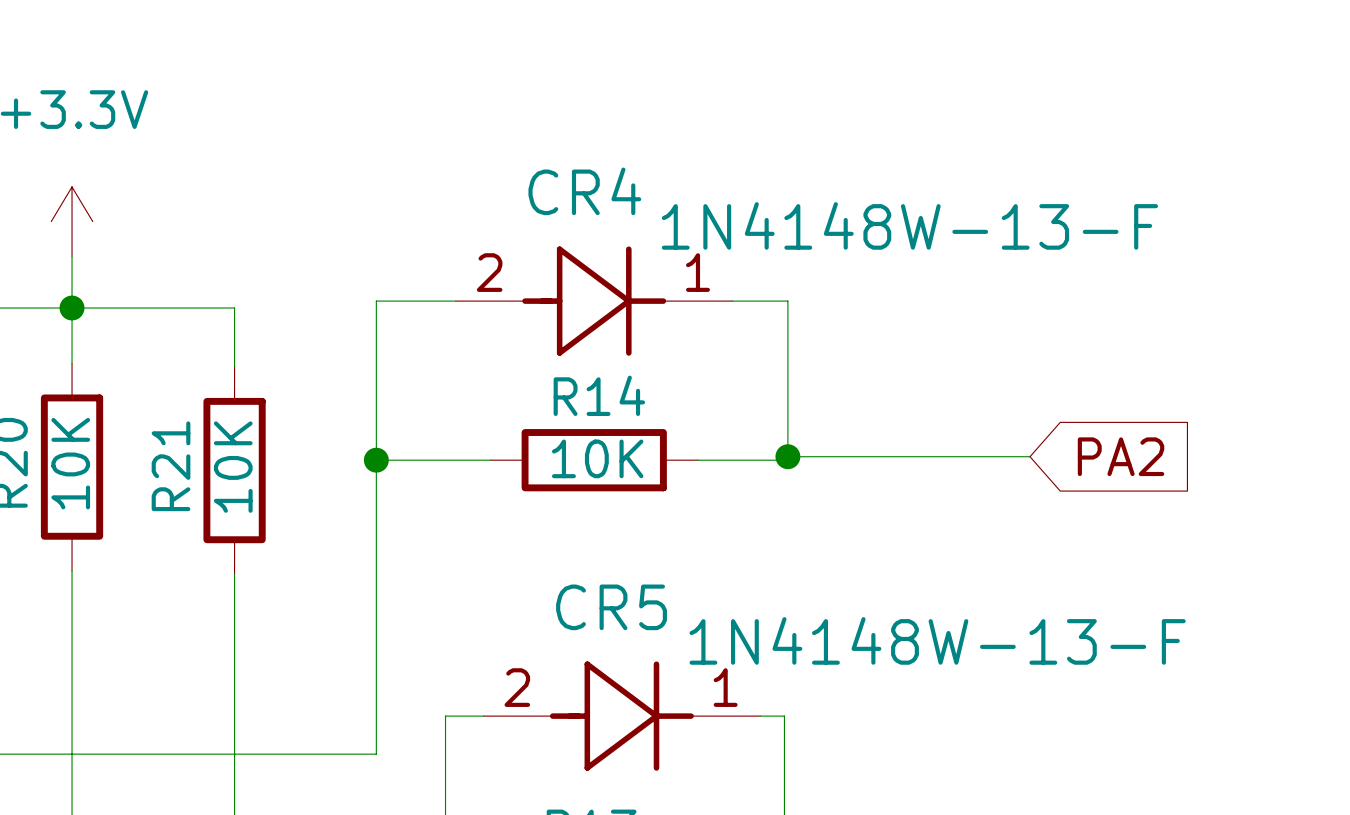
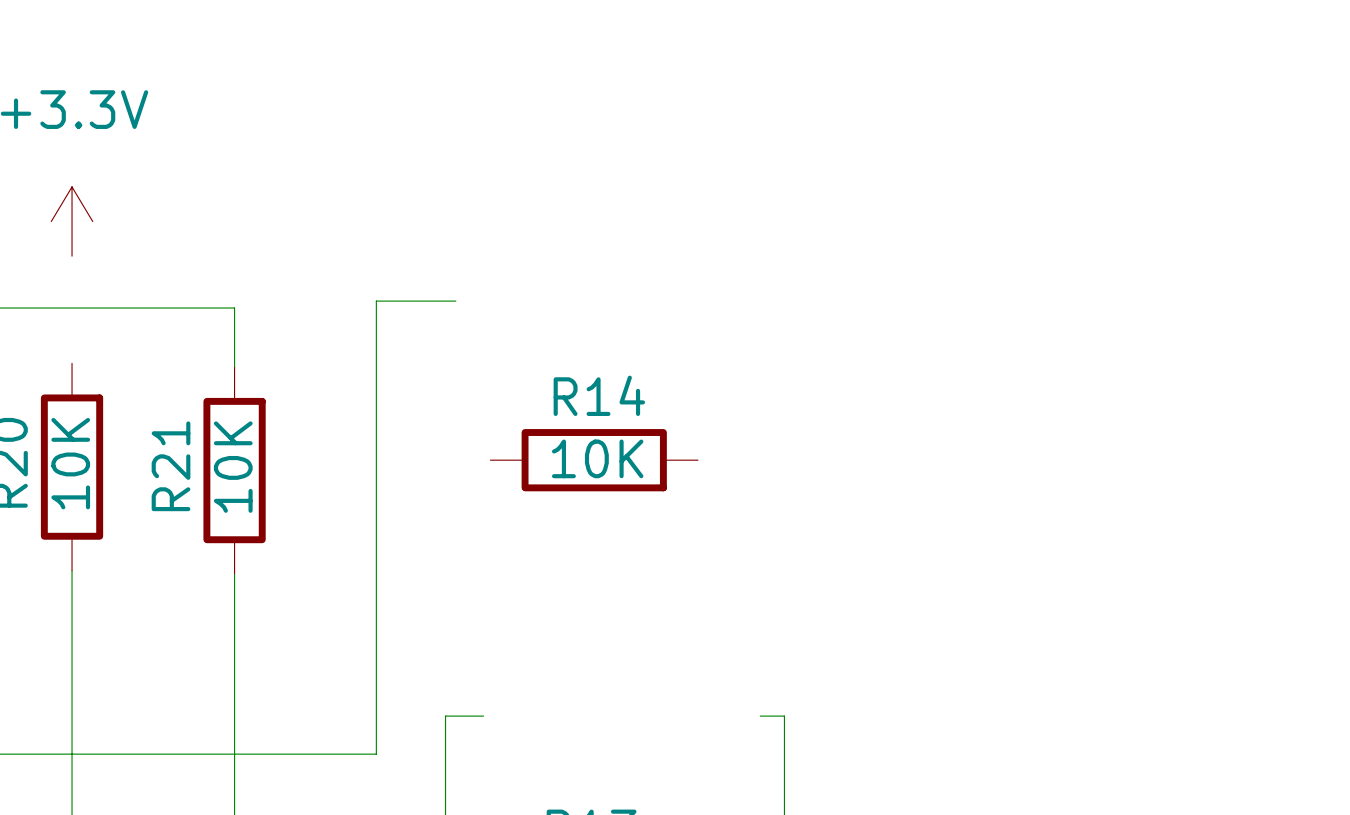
wire: (72, 256) (72, 363) -> none
CR4: 1N4148W-13-F (594, 301) -> none
wire: (732, 301) (787, 301) (787, 460) (697, 460) -> none
junction: (72, 308) -> none
wire: (787, 456) (1029, 456) -> none
junction: (787, 456) -> none
global label: PA2 (1121, 456) -> none
wire: (376, 460) (490, 460) -> none
junction: (376, 460) -> none
CR5: 1N4148W-13-F (621, 716) -> none

